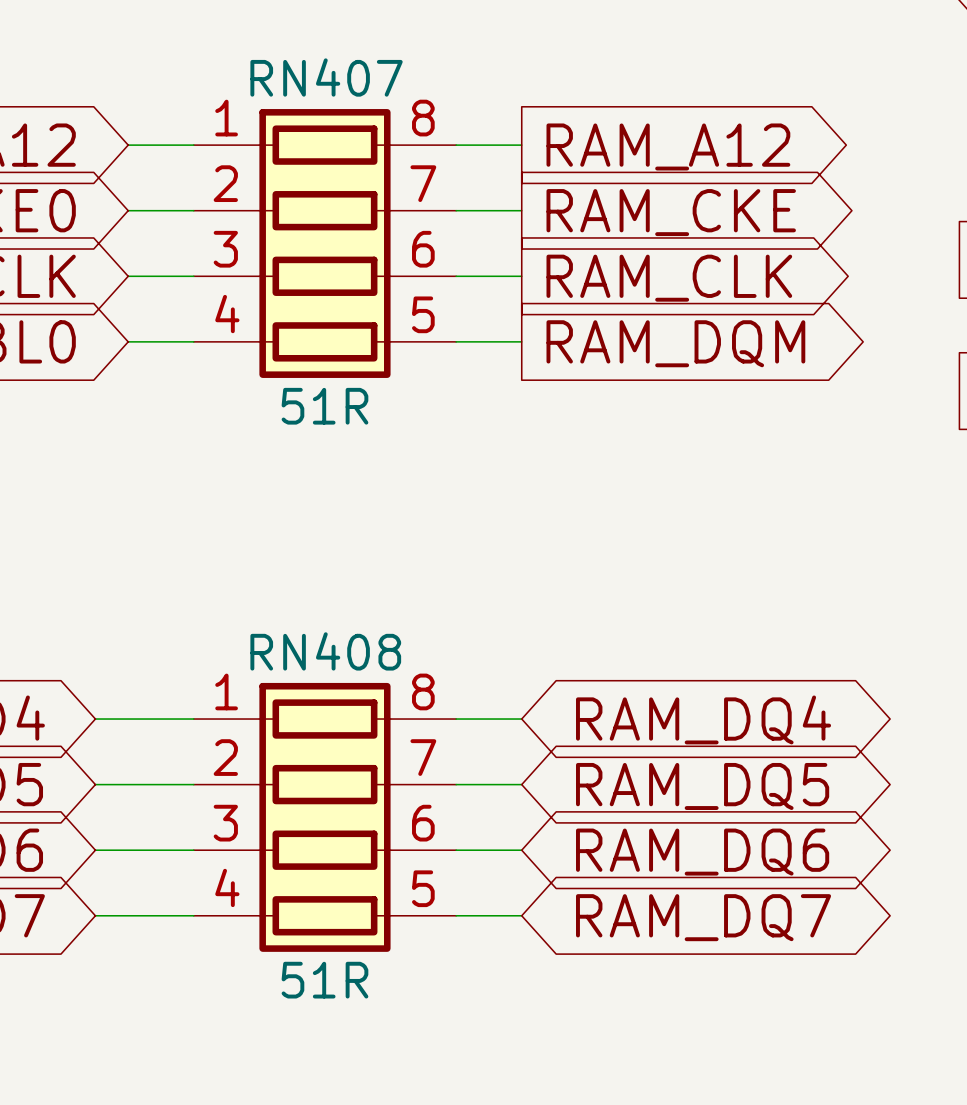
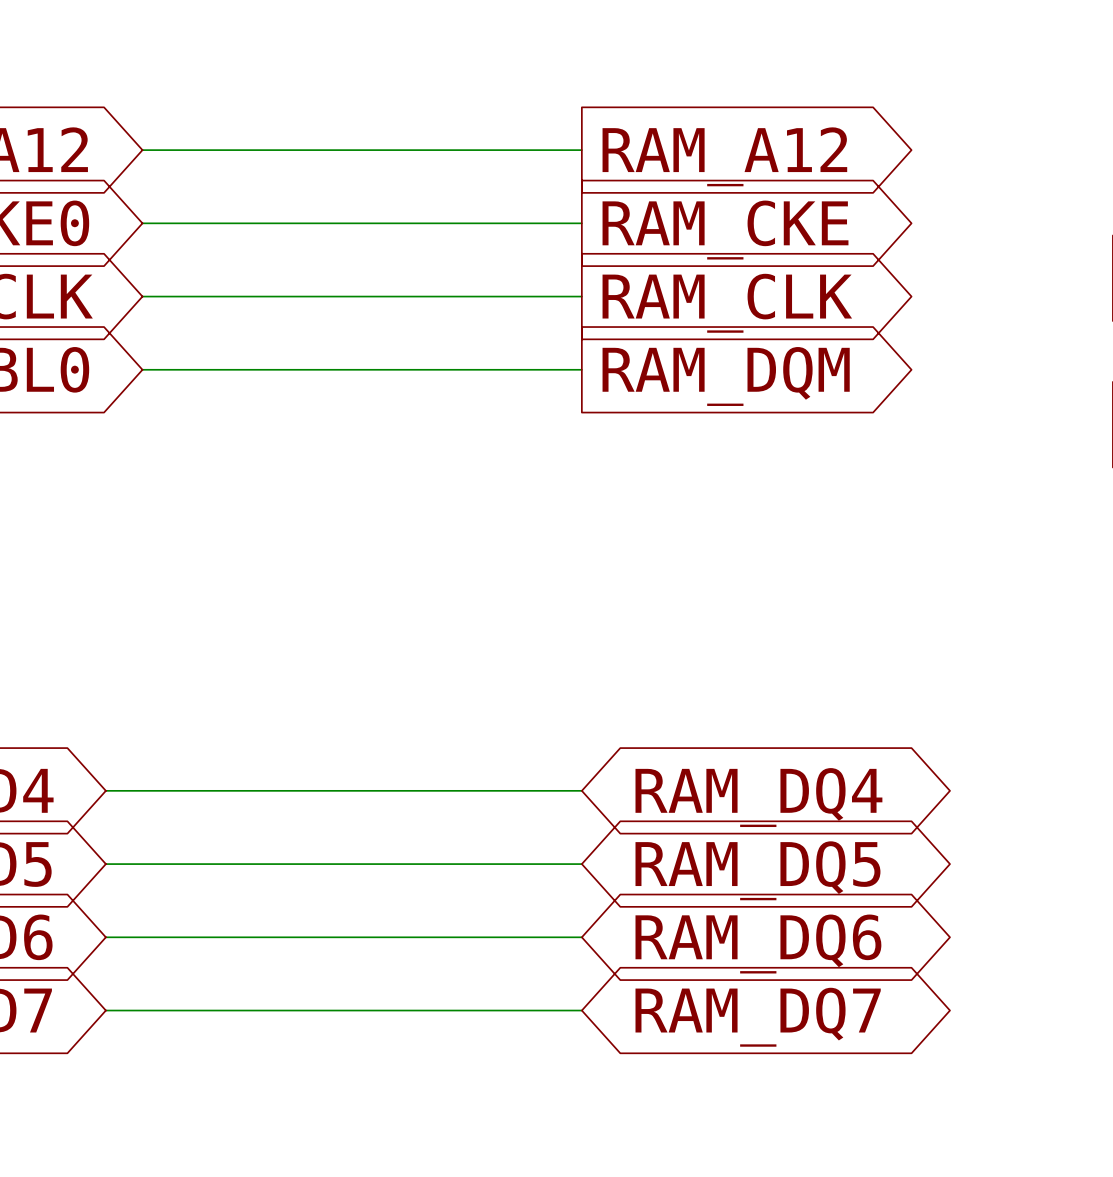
RN407: 51R (324, 243) -> none
RN408: 51R (324, 817) -> none

